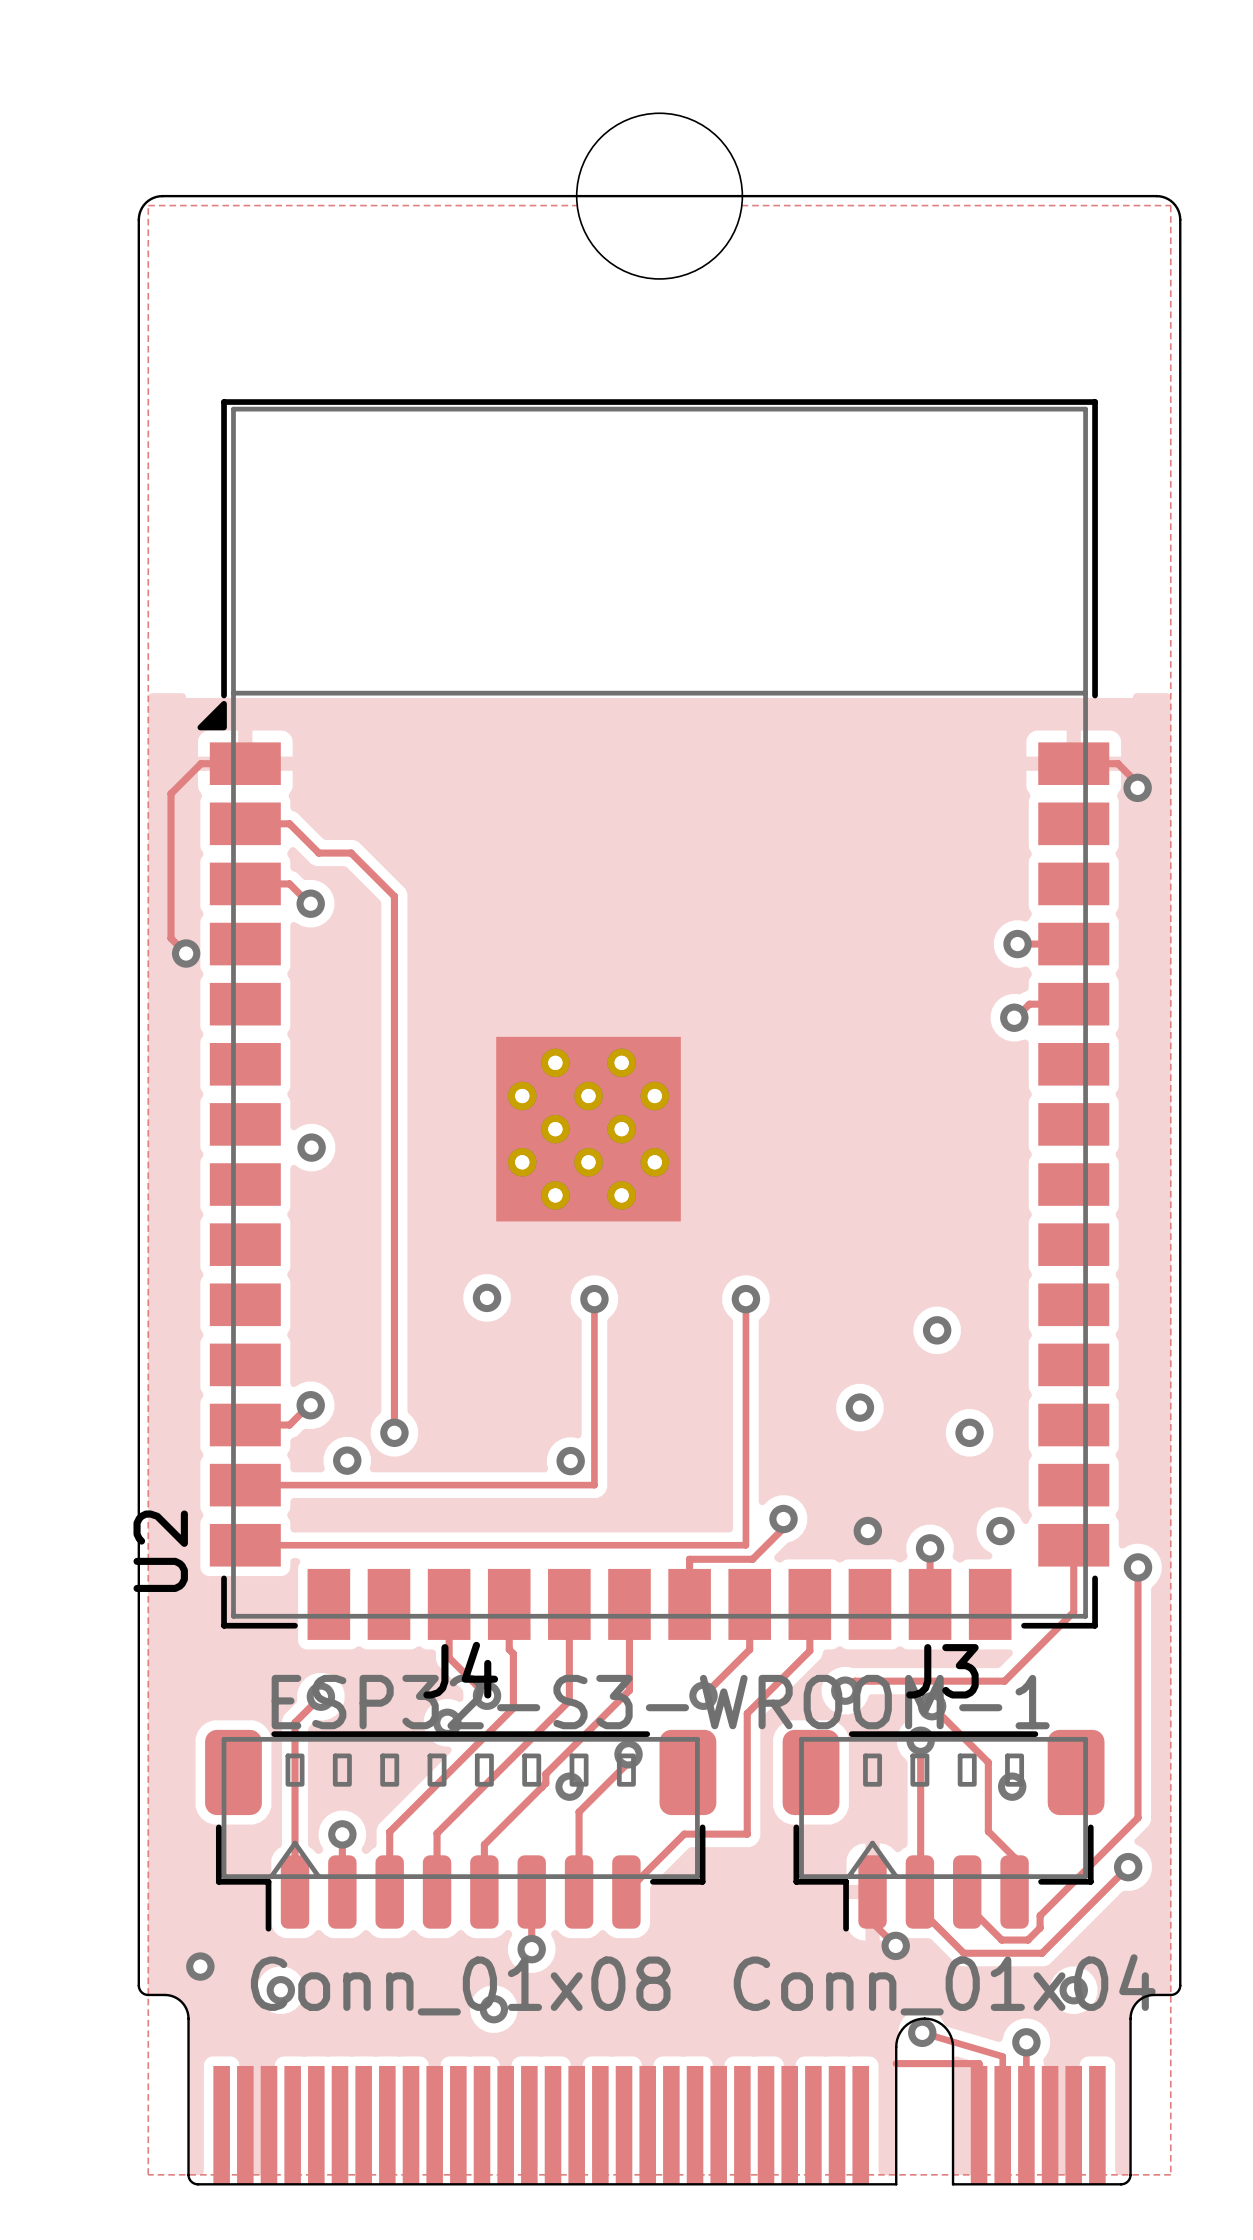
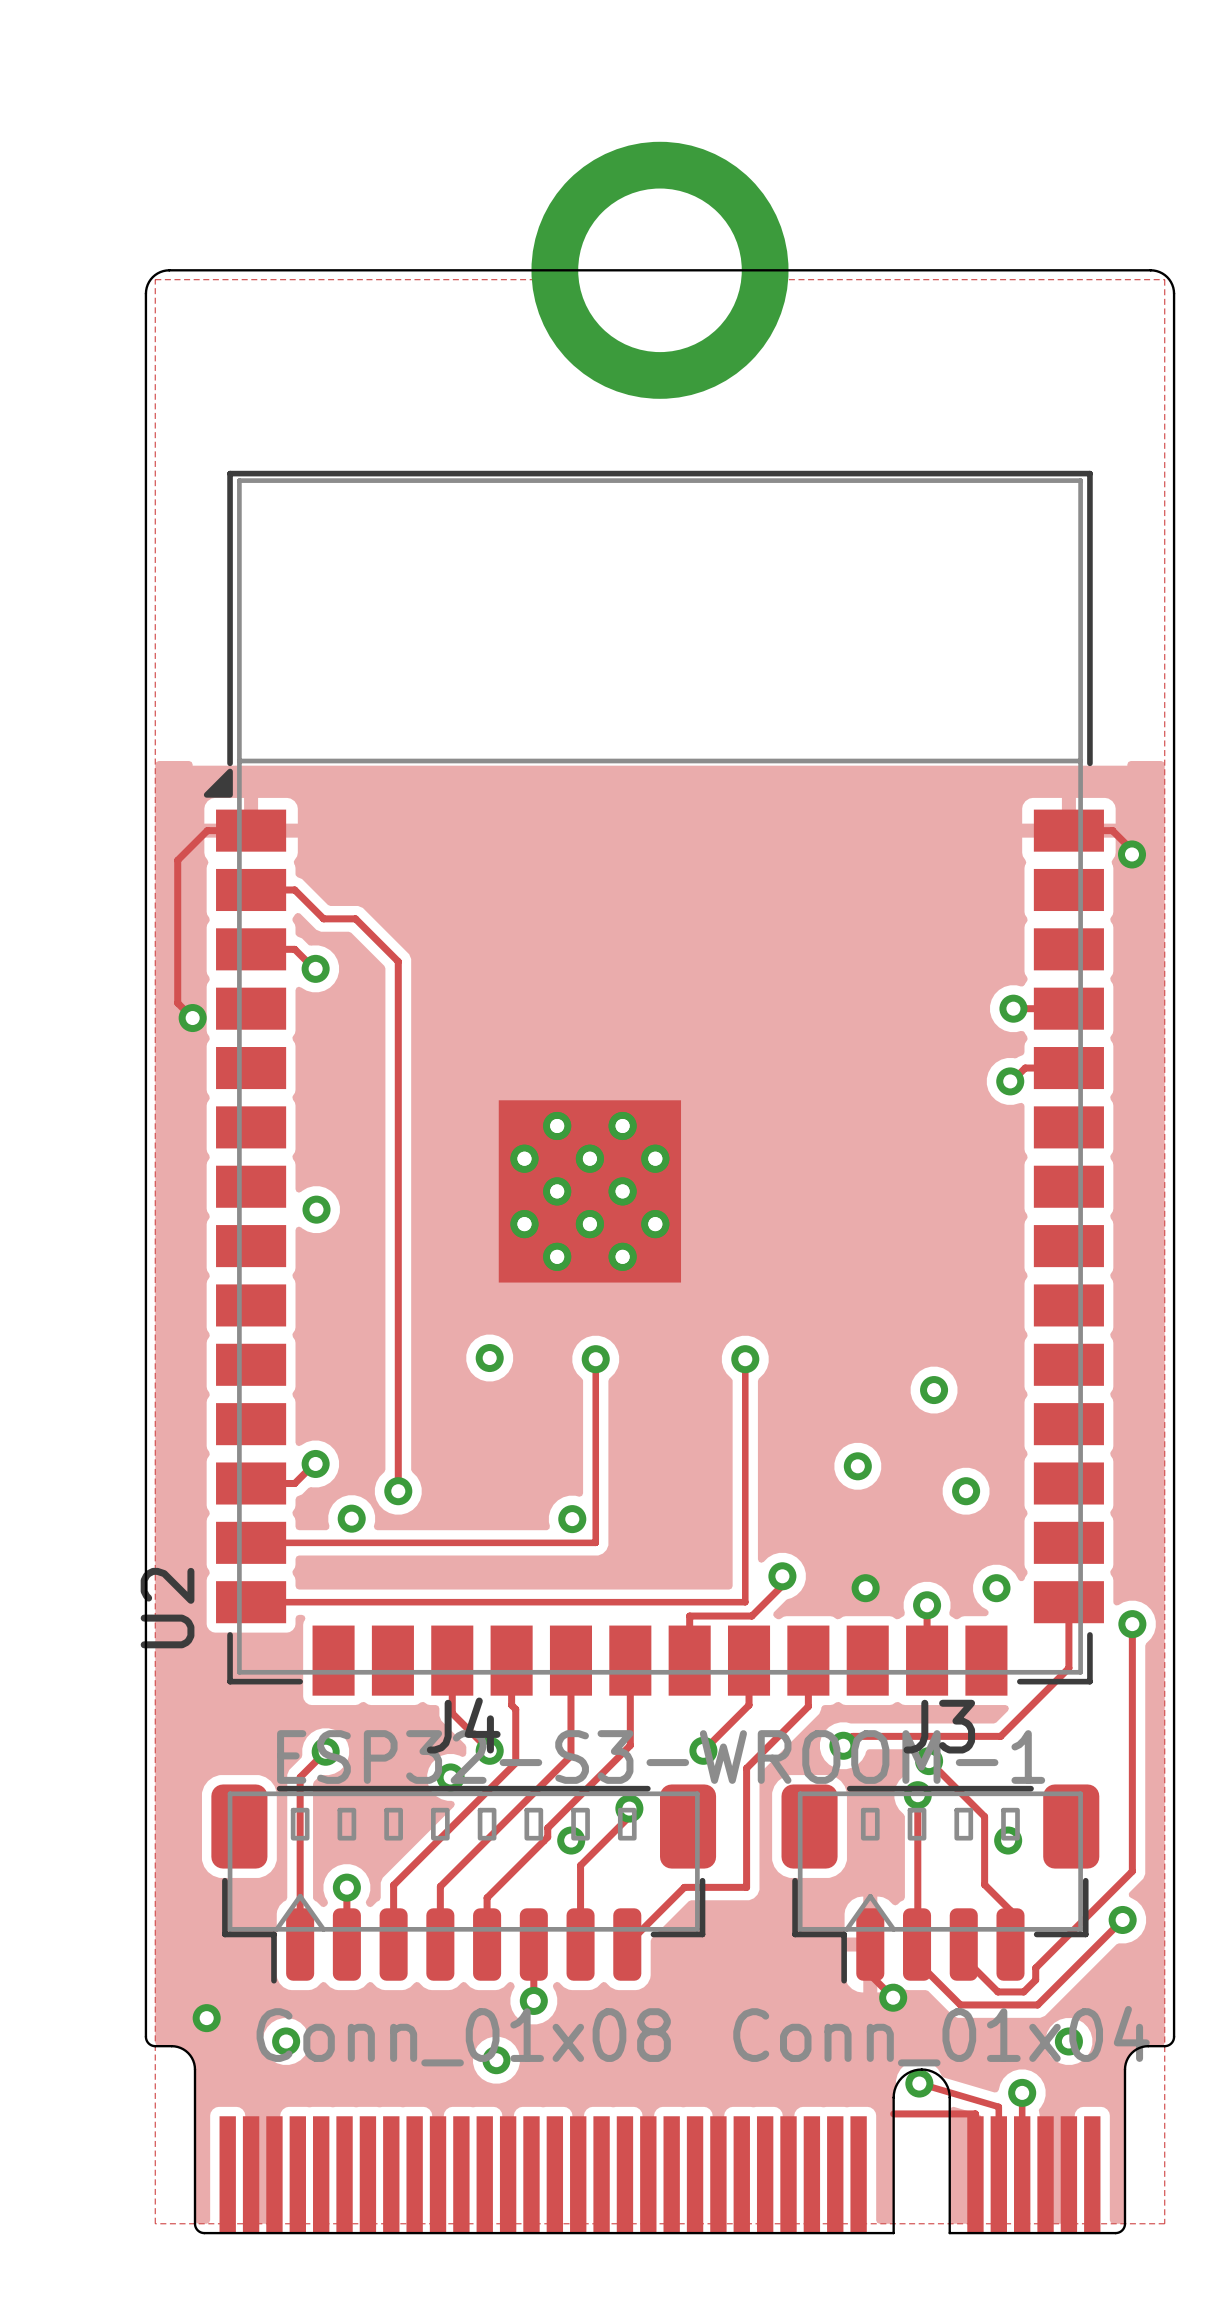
part footprint: [137, 113, 1182, 2186] -> [144, 141, 1176, 2235]

